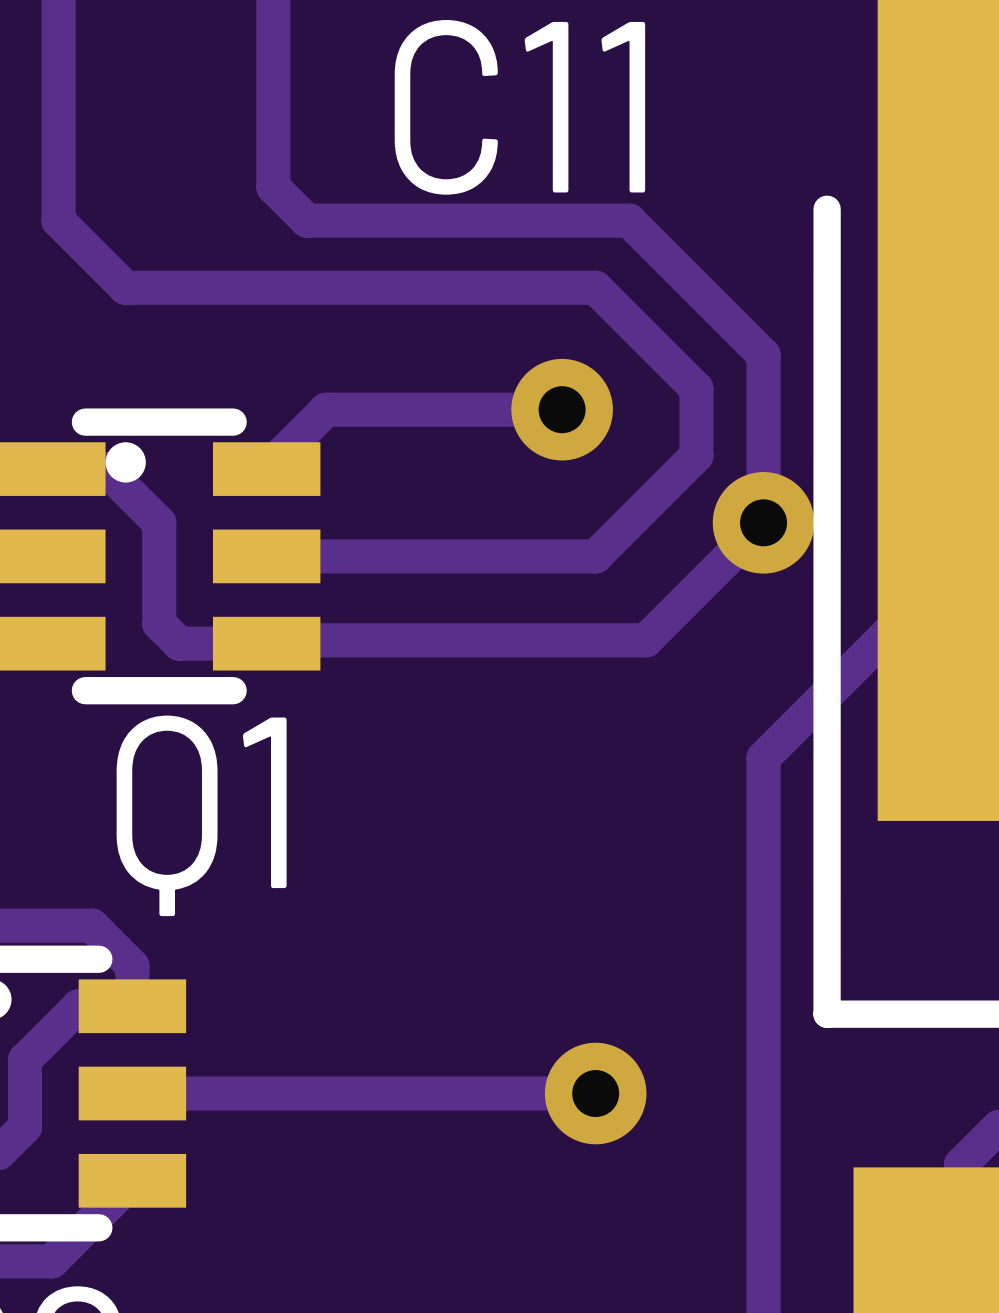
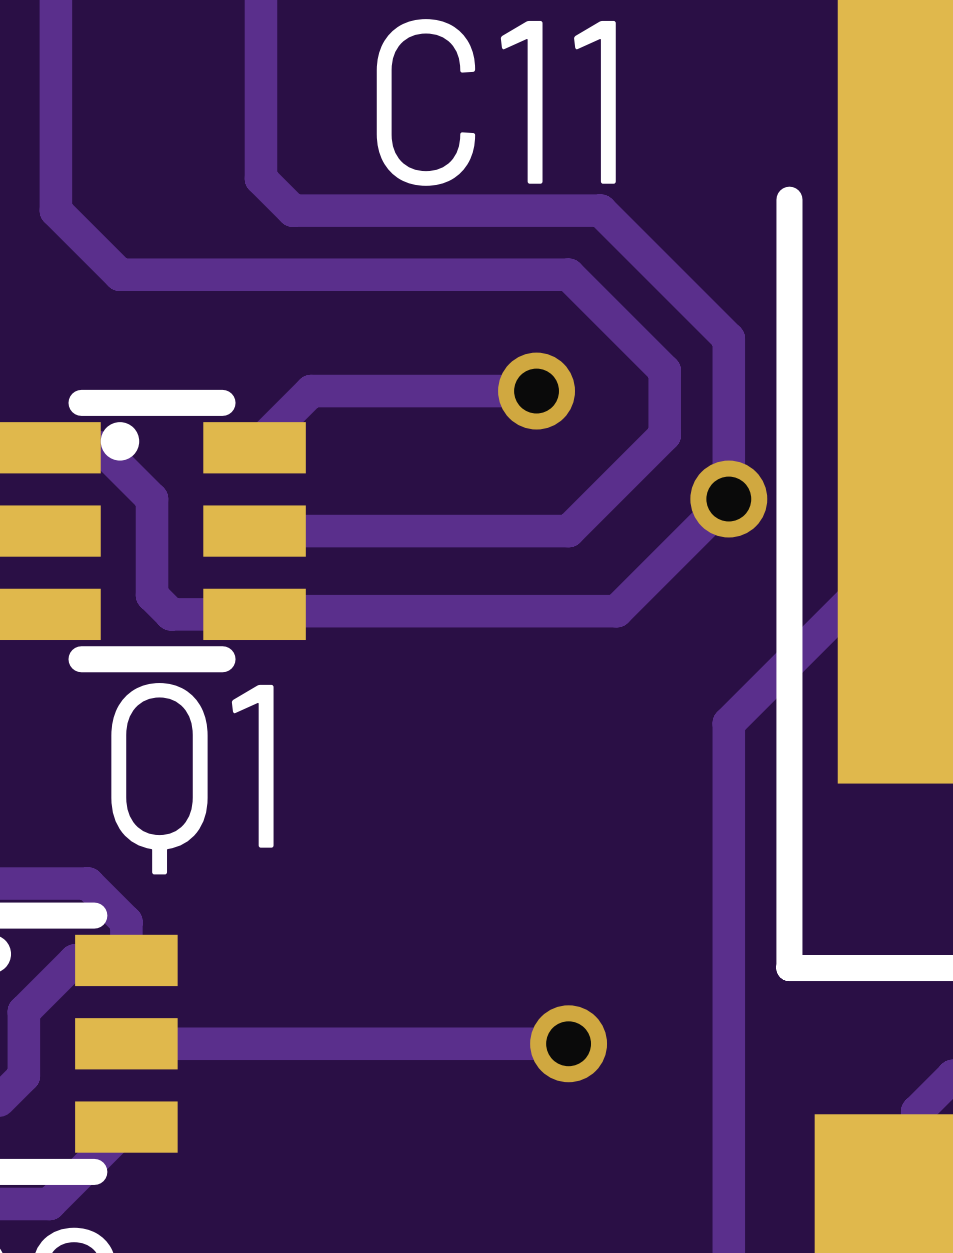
via size: [511, 358, 613, 461] -> [498, 352, 575, 430]
via size: [712, 472, 815, 574] -> [690, 460, 768, 538]
via size: [544, 1042, 647, 1145] -> [530, 1005, 608, 1083]

